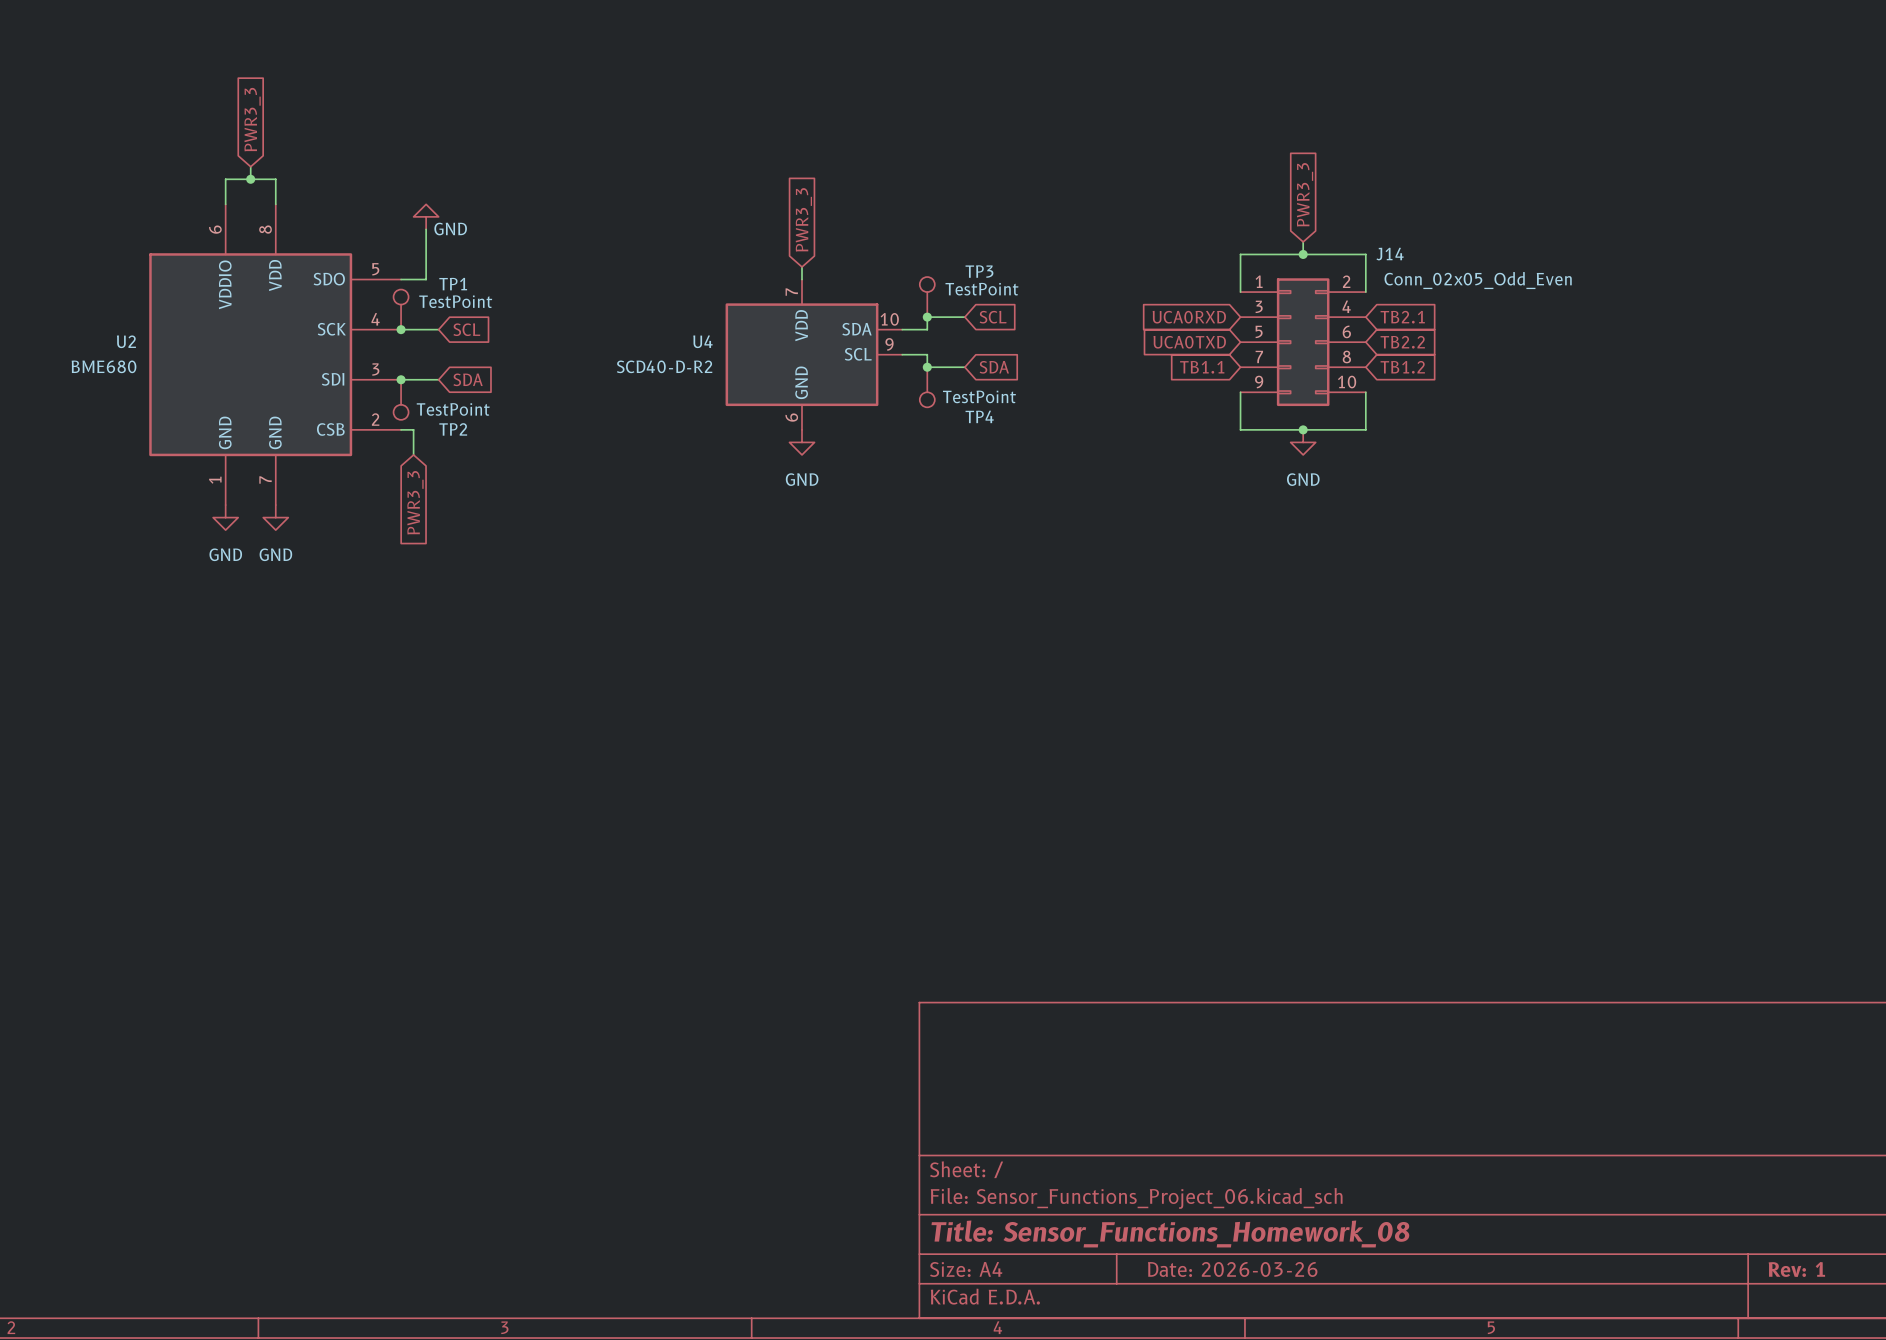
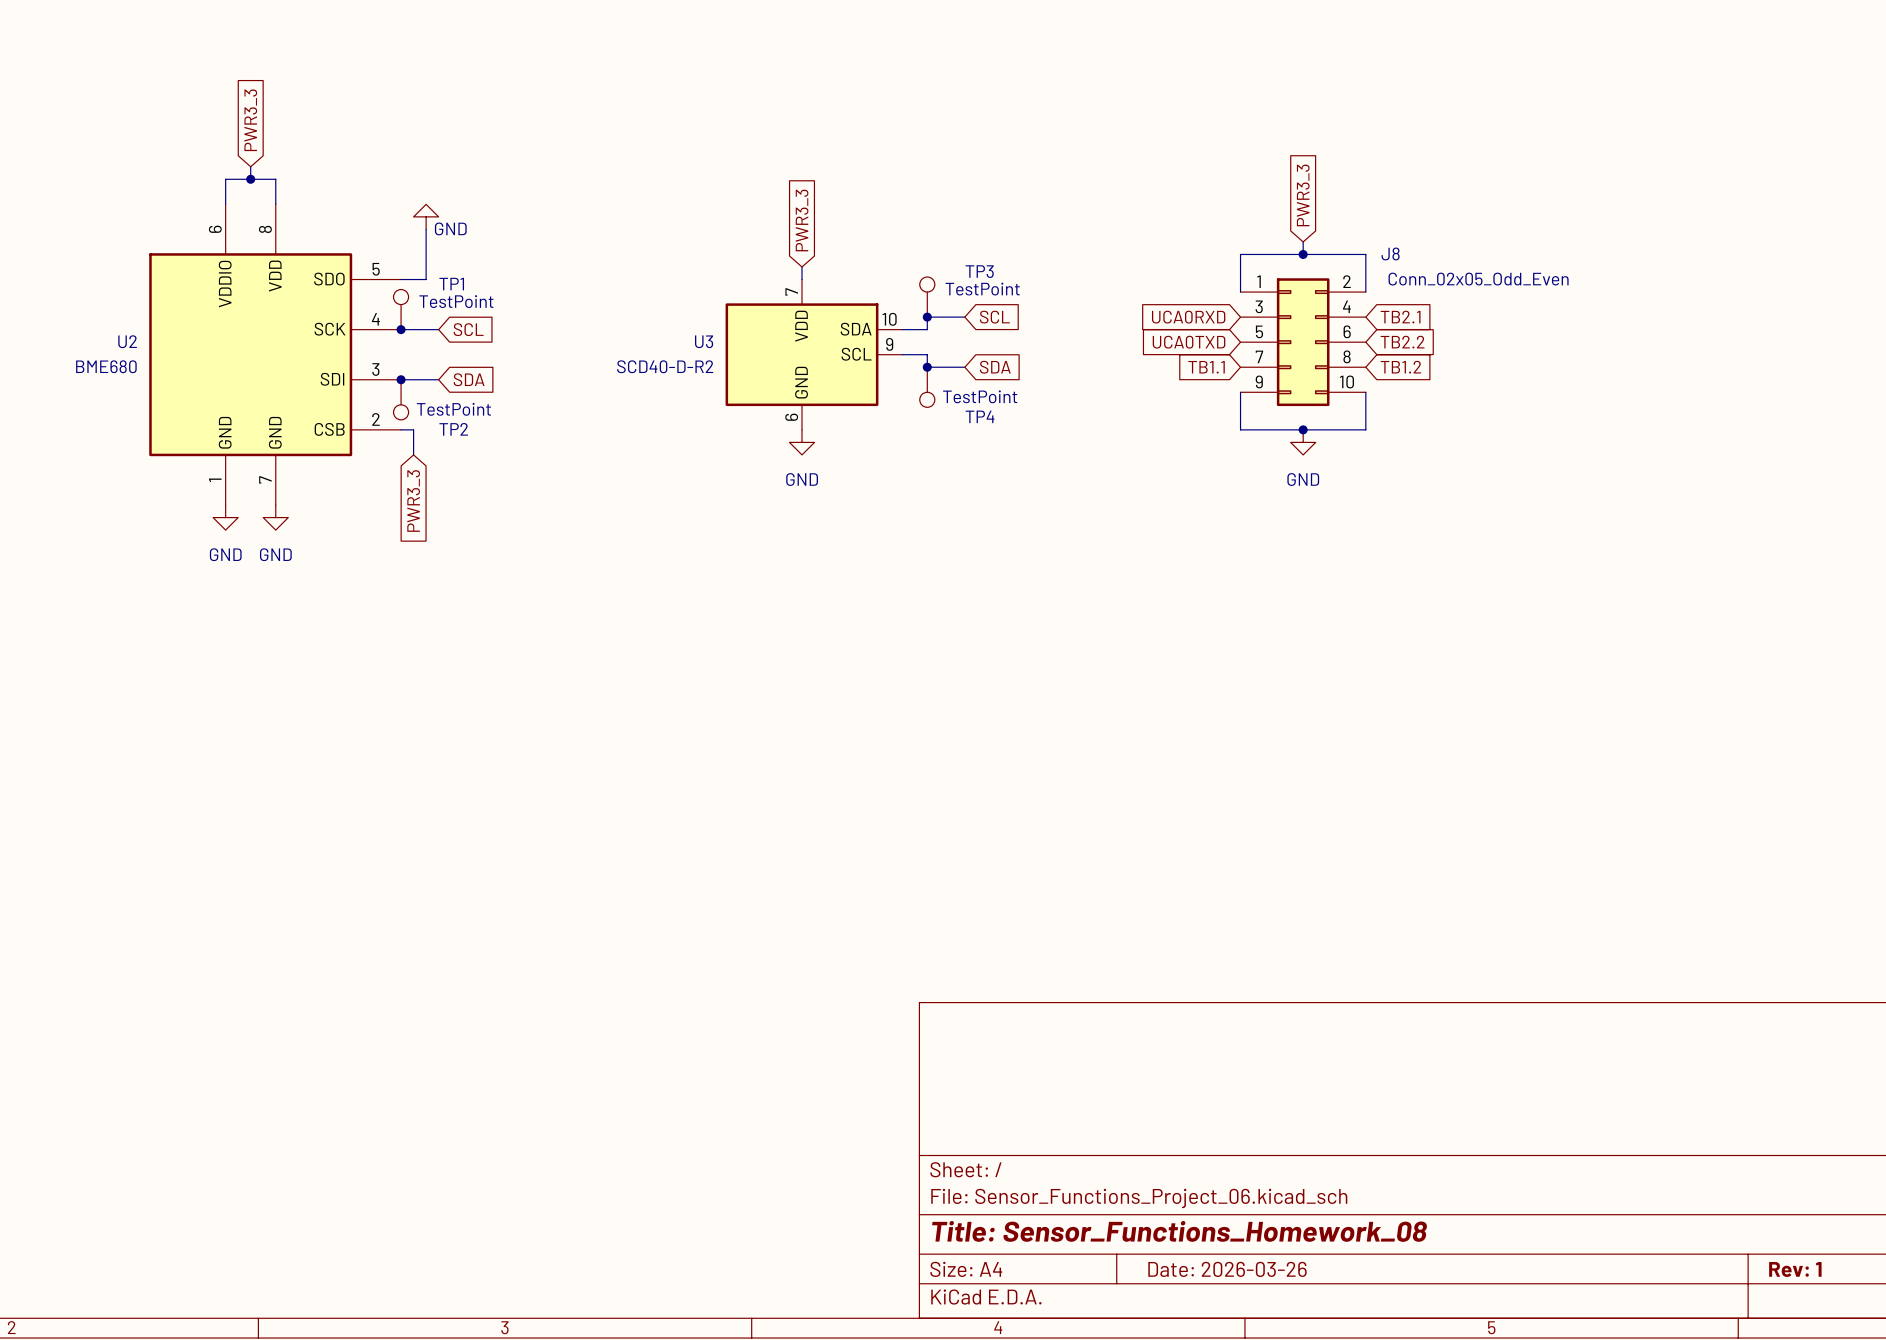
J14 name: J14 (1390, 254) -> J8 (1390, 253)
U4 name: U4 (702, 341) -> U3 (704, 341)

